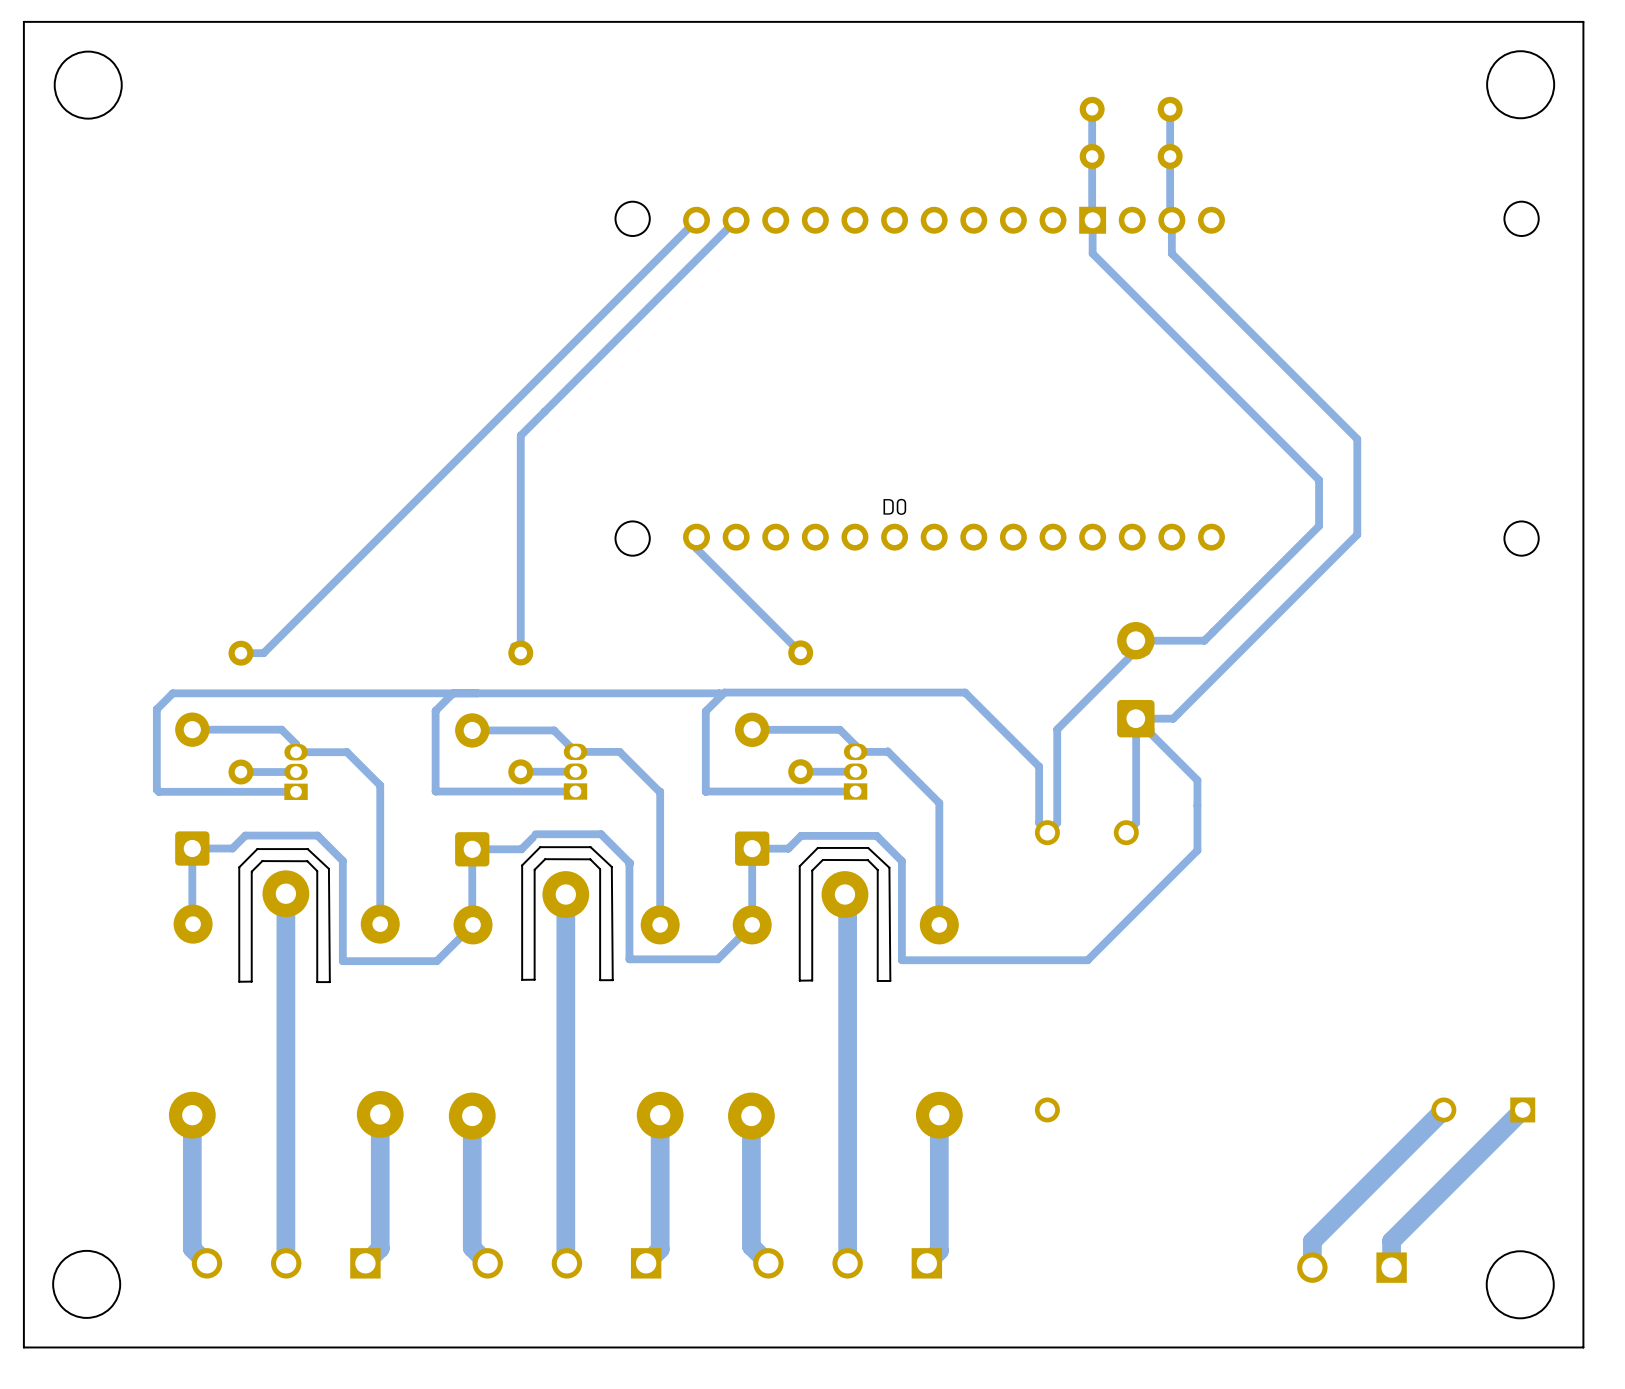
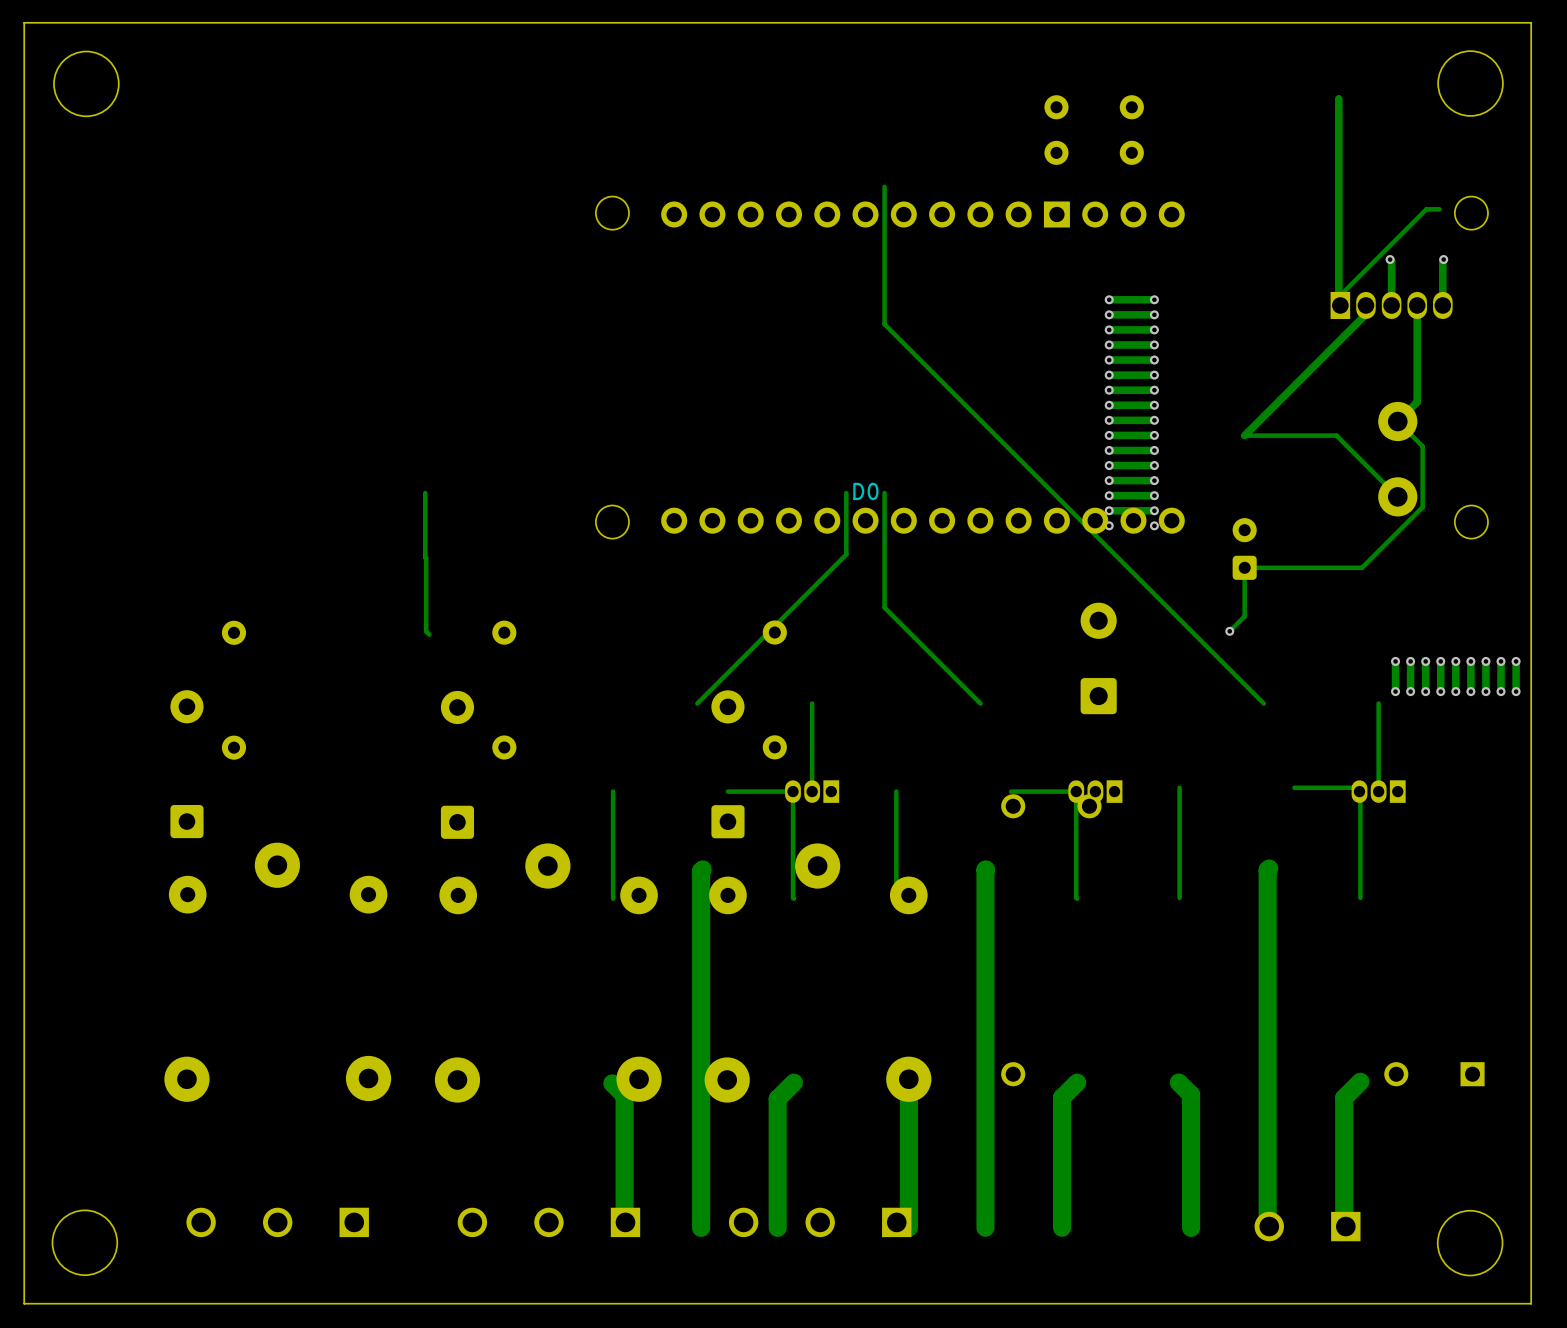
track: none -> (1338, 98) (1338, 303)
track: (1092, 109) (1092, 253) (1319, 480) (1319, 526) (1204, 640) (1135, 640) -> none
track: (1170, 109) (1171, 253) (1357, 439) (1357, 534) (1173, 718) (1135, 718) -> none
track: none -> (884, 186) (884, 324) (1263, 703)
track: none -> (1439, 209) (1426, 209) (1338, 296) (1338, 303)
track: (696, 220) (263, 653) (240, 653) -> none
track: (736, 220) (520, 435) (520, 653) (513, 646) -> none
track: none -> (1390, 259) (1391, 305)
via: none -> (1390, 259)
track: none -> (1443, 259) (1442, 305)
via: none -> (1443, 259)
via: none -> (1109, 299)
track: none -> (1154, 299) (1109, 299)
via: none -> (1154, 299)
track: none -> (1365, 305) (1365, 314) (1244, 435) (1336, 435) (1397, 496)
part: none -> (1391, 305)
track: none -> (1417, 305) (1417, 402) (1397, 421) (1422, 446) (1422, 507) (1362, 567) (1244, 567) (1244, 616) (1229, 631)
via: none -> (1109, 314)
track: none -> (1154, 314) (1109, 314)
via: none -> (1154, 314)
via: none -> (1109, 329)
track: none -> (1154, 329) (1109, 329)
via: none -> (1154, 329)
via: none -> (1109, 344)
track: none -> (1154, 344) (1109, 344)
via: none -> (1154, 344)
via: none -> (1109, 360)
track: none -> (1154, 360) (1109, 360)
via: none -> (1154, 360)
via: none -> (1109, 375)
track: none -> (1154, 375) (1109, 375)
via: none -> (1154, 375)
via: none -> (1109, 390)
track: none -> (1154, 390) (1109, 390)
via: none -> (1154, 390)
via: none -> (1109, 405)
track: none -> (1154, 405) (1109, 405)
via: none -> (1154, 405)
via: none -> (1109, 420)
track: none -> (1154, 420) (1109, 420)
via: none -> (1154, 420)
via: none -> (1109, 435)
track: none -> (1154, 435) (1109, 435)
via: none -> (1154, 435)
via: none -> (1109, 450)
track: none -> (1154, 450) (1109, 450)
via: none -> (1154, 450)
part: none -> (1397, 459)
via: none -> (1109, 465)
track: none -> (1154, 465) (1109, 465)
via: none -> (1154, 465)
via: none -> (1109, 480)
track: none -> (1154, 480) (1109, 480)
via: none -> (1154, 480)
track: none -> (425, 493) (426, 631) (429, 634)
track: none -> (846, 493) (846, 554) (697, 703)
track: none -> (884, 493) (884, 607) (980, 703)
via: none -> (1109, 495)
track: none -> (1154, 495) (1109, 495)
via: none -> (1154, 495)
via: none -> (1109, 510)
track: none -> (1154, 510) (1109, 510)
via: none -> (1154, 510)
track: (696, 537) (696, 548) (800, 652) -> none
via: none -> (1109, 525)
via: none -> (1154, 525)
part: none -> (1244, 548)
track: (1135, 640) (1135, 650) (1057, 729) (1057, 822) (1047, 832) (1039, 823) (1039, 766) (965, 692) (724, 692) (705, 711) (705, 791) (855, 791) -> none
via: none -> (1229, 631)
track: none -> (1395, 661) (1395, 691)
via: none -> (1395, 661)
track: none -> (1410, 661) (1410, 691)
via: none -> (1410, 661)
track: none -> (1425, 661) (1425, 691)
via: none -> (1425, 661)
track: none -> (1440, 661) (1440, 691)
via: none -> (1440, 661)
track: none -> (1455, 661) (1455, 691)
via: none -> (1455, 661)
track: none -> (1470, 661) (1470, 691)
via: none -> (1470, 661)
track: none -> (1485, 661) (1485, 691)
via: none -> (1485, 661)
track: none -> (1501, 661) (1501, 691)
via: none -> (1501, 661)
track: none -> (1516, 661) (1516, 691)
via: none -> (1516, 661)
track: (453, 693) (435, 710) (435, 791) -> none
track: (721, 695) (719, 693) (172, 693) (156, 709) (156, 789) (158, 791) (296, 791) -> none
via: none -> (1395, 691)
via: none -> (1410, 691)
via: none -> (1425, 691)
via: none -> (1440, 691)
via: none -> (1455, 691)
via: none -> (1470, 691)
via: none -> (1485, 691)
via: none -> (1501, 691)
via: none -> (1516, 691)
track: (1135, 718) (1197, 780) (1197, 850) (1087, 960) (901, 960) (901, 861) (876, 835) (801, 835) (788, 848) (752, 848) -> none
track: (1135, 718) (1136, 822) (1126, 832) -> none
track: none -> (812, 703) (812, 791)
track: none -> (1378, 703) (1378, 791)
track: (192, 729) (281, 729) (296, 744) (296, 752) (347, 752) (380, 785) (380, 924) -> none
track: (839, 729) (855, 745) (855, 751) (887, 751) (939, 803) (939, 924) -> none
track: (839, 729) (752, 729) -> none
track: (472, 730) (554, 730) (575, 751) (619, 751) (660, 791) (660, 924) -> none
track: (575, 771) (520, 771) -> none
part: (575, 771) -> none
track: (855, 771) (800, 771) -> none
part rotation: 0° (855, 771) -> 90° counterclockwise (812, 791)
part position: (855, 771) -> (812, 791)
track: (296, 772) (240, 772) -> none
part: (296, 772) -> none
track: (575, 791) (435, 791) -> none
track: none -> (1179, 787) (1179, 897)
track: none -> (1294, 787) (1355, 787) (1360, 792) (1360, 897)
track: none -> (613, 791) (613, 898)
track: none -> (727, 791) (793, 791) (793, 898)
track: none -> (896, 791) (896, 898)
track: none -> (1011, 791) (1076, 791) (1077, 898)
part: none -> (1095, 791)
part: none -> (1378, 791)
track: (535, 834) (601, 834) (630, 863) (629, 959) (717, 959) (752, 924) (752, 848) -> none
track: (532, 837) (521, 849) -> none
board edge: (590, 847) (540, 847) (522, 865) (522, 979) (534, 979) (534, 869) (545, 859) (590, 859) (600, 869) (600, 980) (612, 980) (611, 866) (590, 847) -> none
board edge: (868, 847) (817, 847) (799, 866) (799, 980) (812, 980) (812, 870) (822, 859) (867, 860) (877, 869) (877, 980) (890, 980) (889, 867) (868, 847) -> none
board edge: (307, 849) (257, 849) (239, 867) (239, 981) (251, 981) (251, 871) (262, 861) (307, 861) (317, 871) (317, 982) (329, 982) (328, 868) (307, 849) -> none
track: (521, 849) (472, 849) (473, 924) (436, 961) (342, 961) (342, 860) (317, 835) (245, 835) (232, 848) (192, 848) (193, 924) -> none
track: (285, 893) (286, 1263) -> none
track: (565, 894) (566, 1263) -> none
track: (844, 894) (847, 897) (847, 1263) -> none
track: none -> (702, 869) (701, 871) (701, 1227)
track: none -> (986, 869) (985, 1227)
track: none -> (1269, 868) (1267, 870) (1267, 1227)
track: (1445, 1111) (1443, 1109) (1312, 1241) (1312, 1267) (1315, 1267) -> none
track: (1524, 1111) (1522, 1109) (1391, 1241) (1391, 1267) (1394, 1267) -> none
track: (380, 1114) (380, 1248) (365, 1263) -> none
track: (192, 1115) (192, 1248) (206, 1263) -> none
track: (472, 1115) (472, 1247) (487, 1263) -> none
track: (660, 1115) (660, 1249) (646, 1263) -> none
track: (751, 1115) (751, 1246) (768, 1263) -> none
track: (939, 1115) (939, 1250) (926, 1263) -> none
track: none -> (1360, 1081) (1344, 1097) (1344, 1227)
track: none -> (793, 1082) (777, 1098) (777, 1227)
track: none -> (1077, 1082) (1062, 1097) (1062, 1227)
track: none -> (1178, 1082) (1191, 1094) (1191, 1227)
track: none -> (612, 1083) (624, 1095) (624, 1227)
track: none -> (895, 1083) (908, 1096) (908, 1227)

